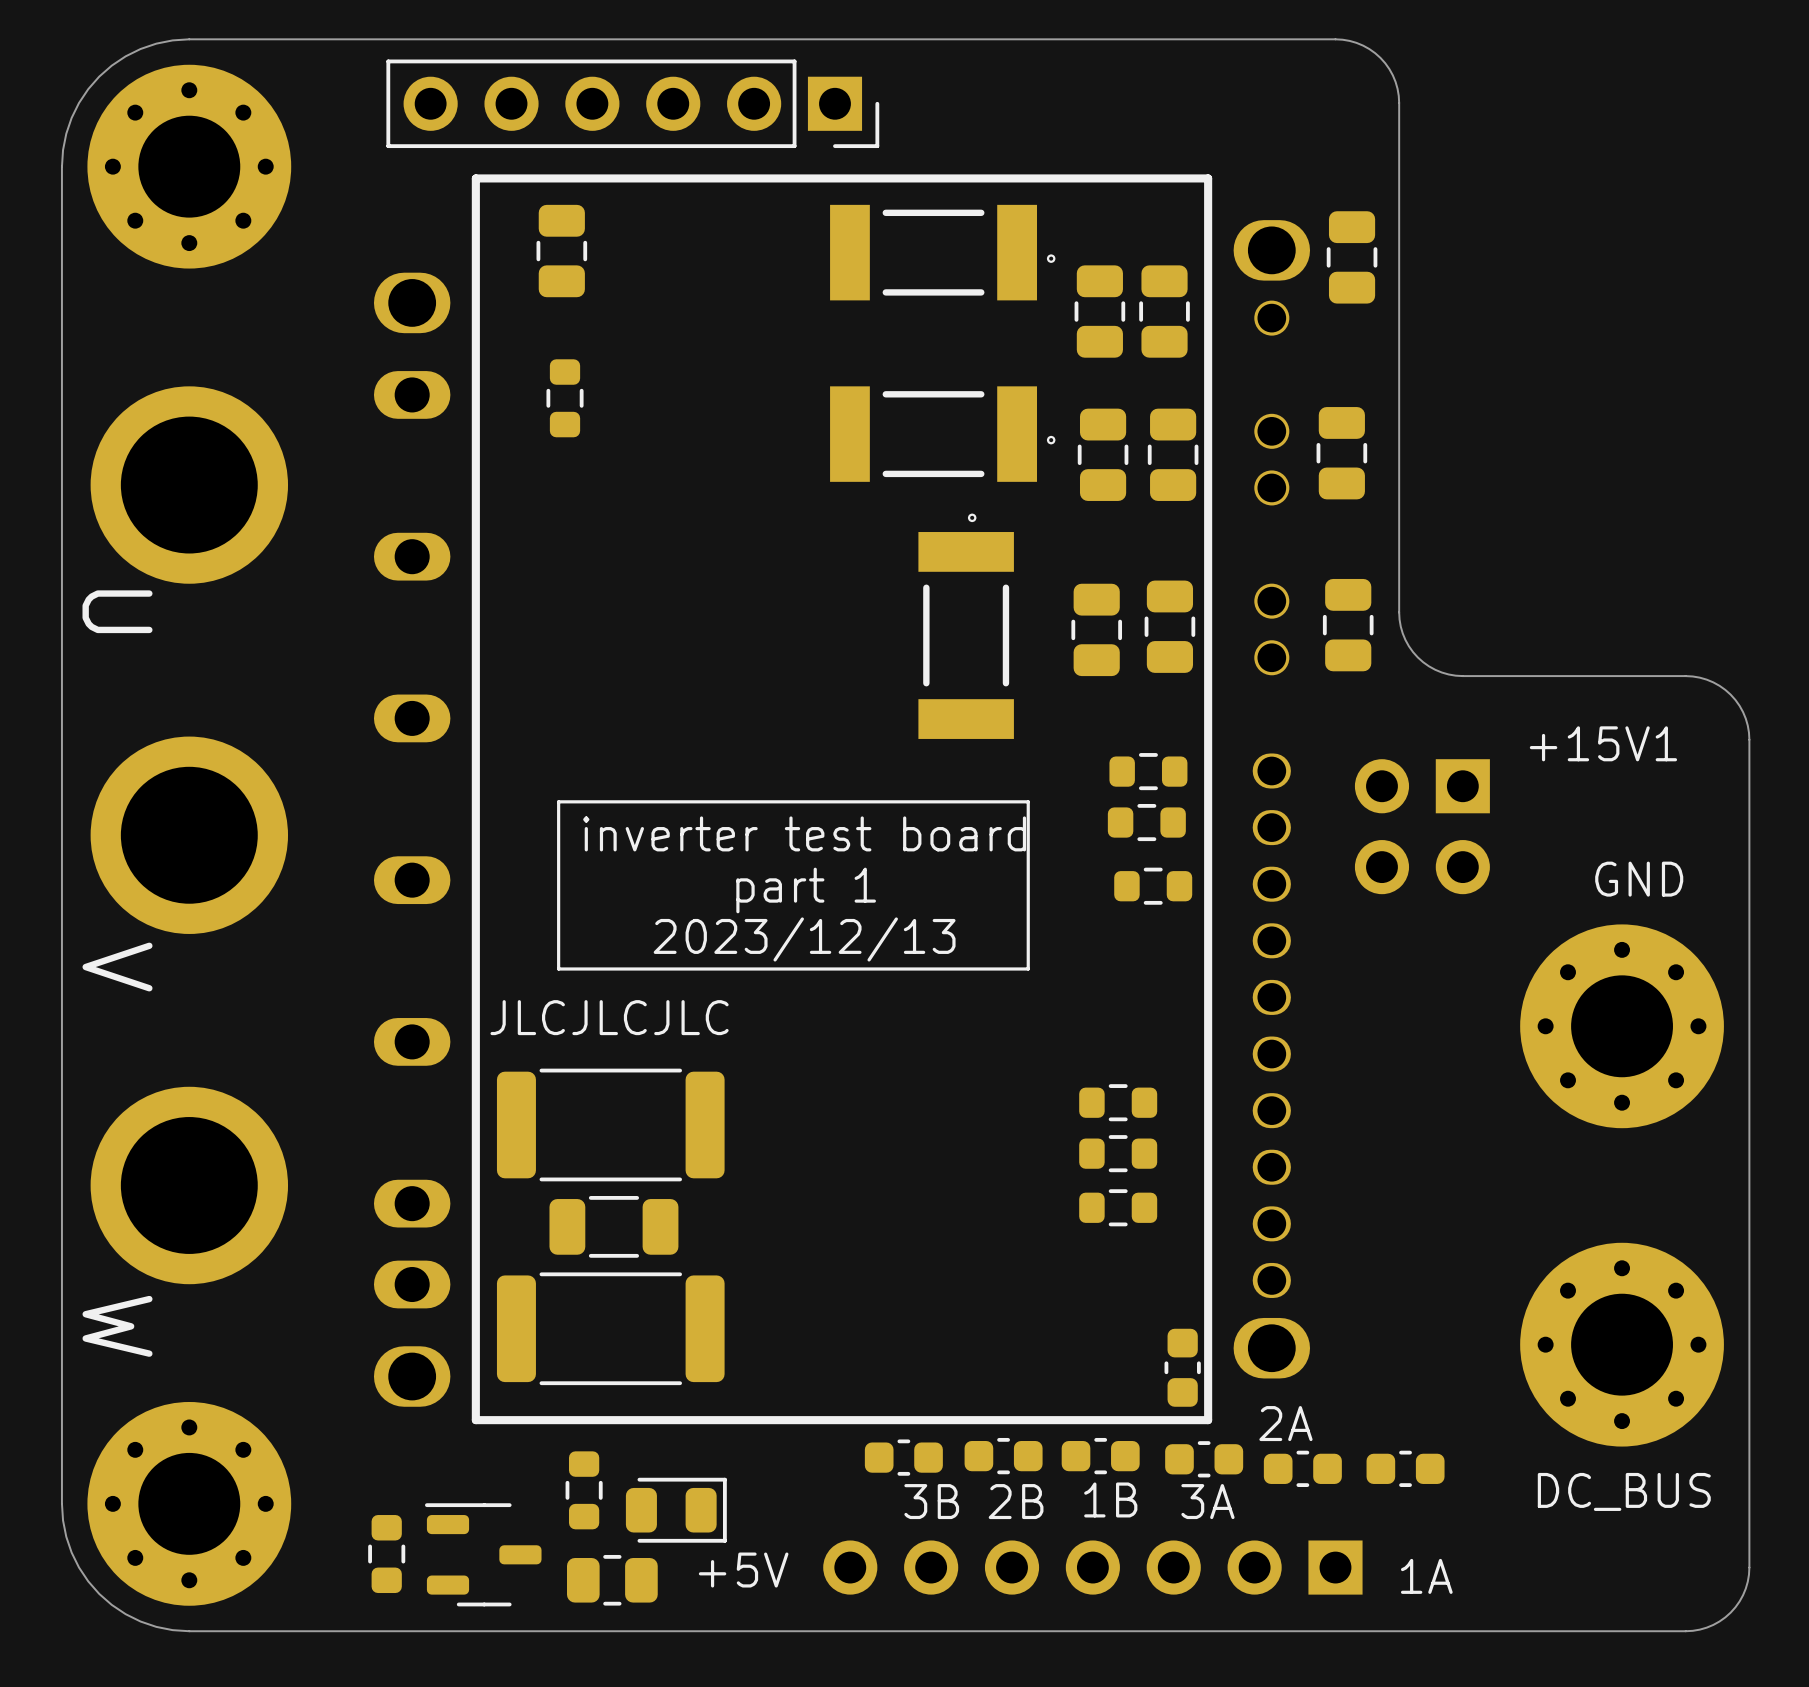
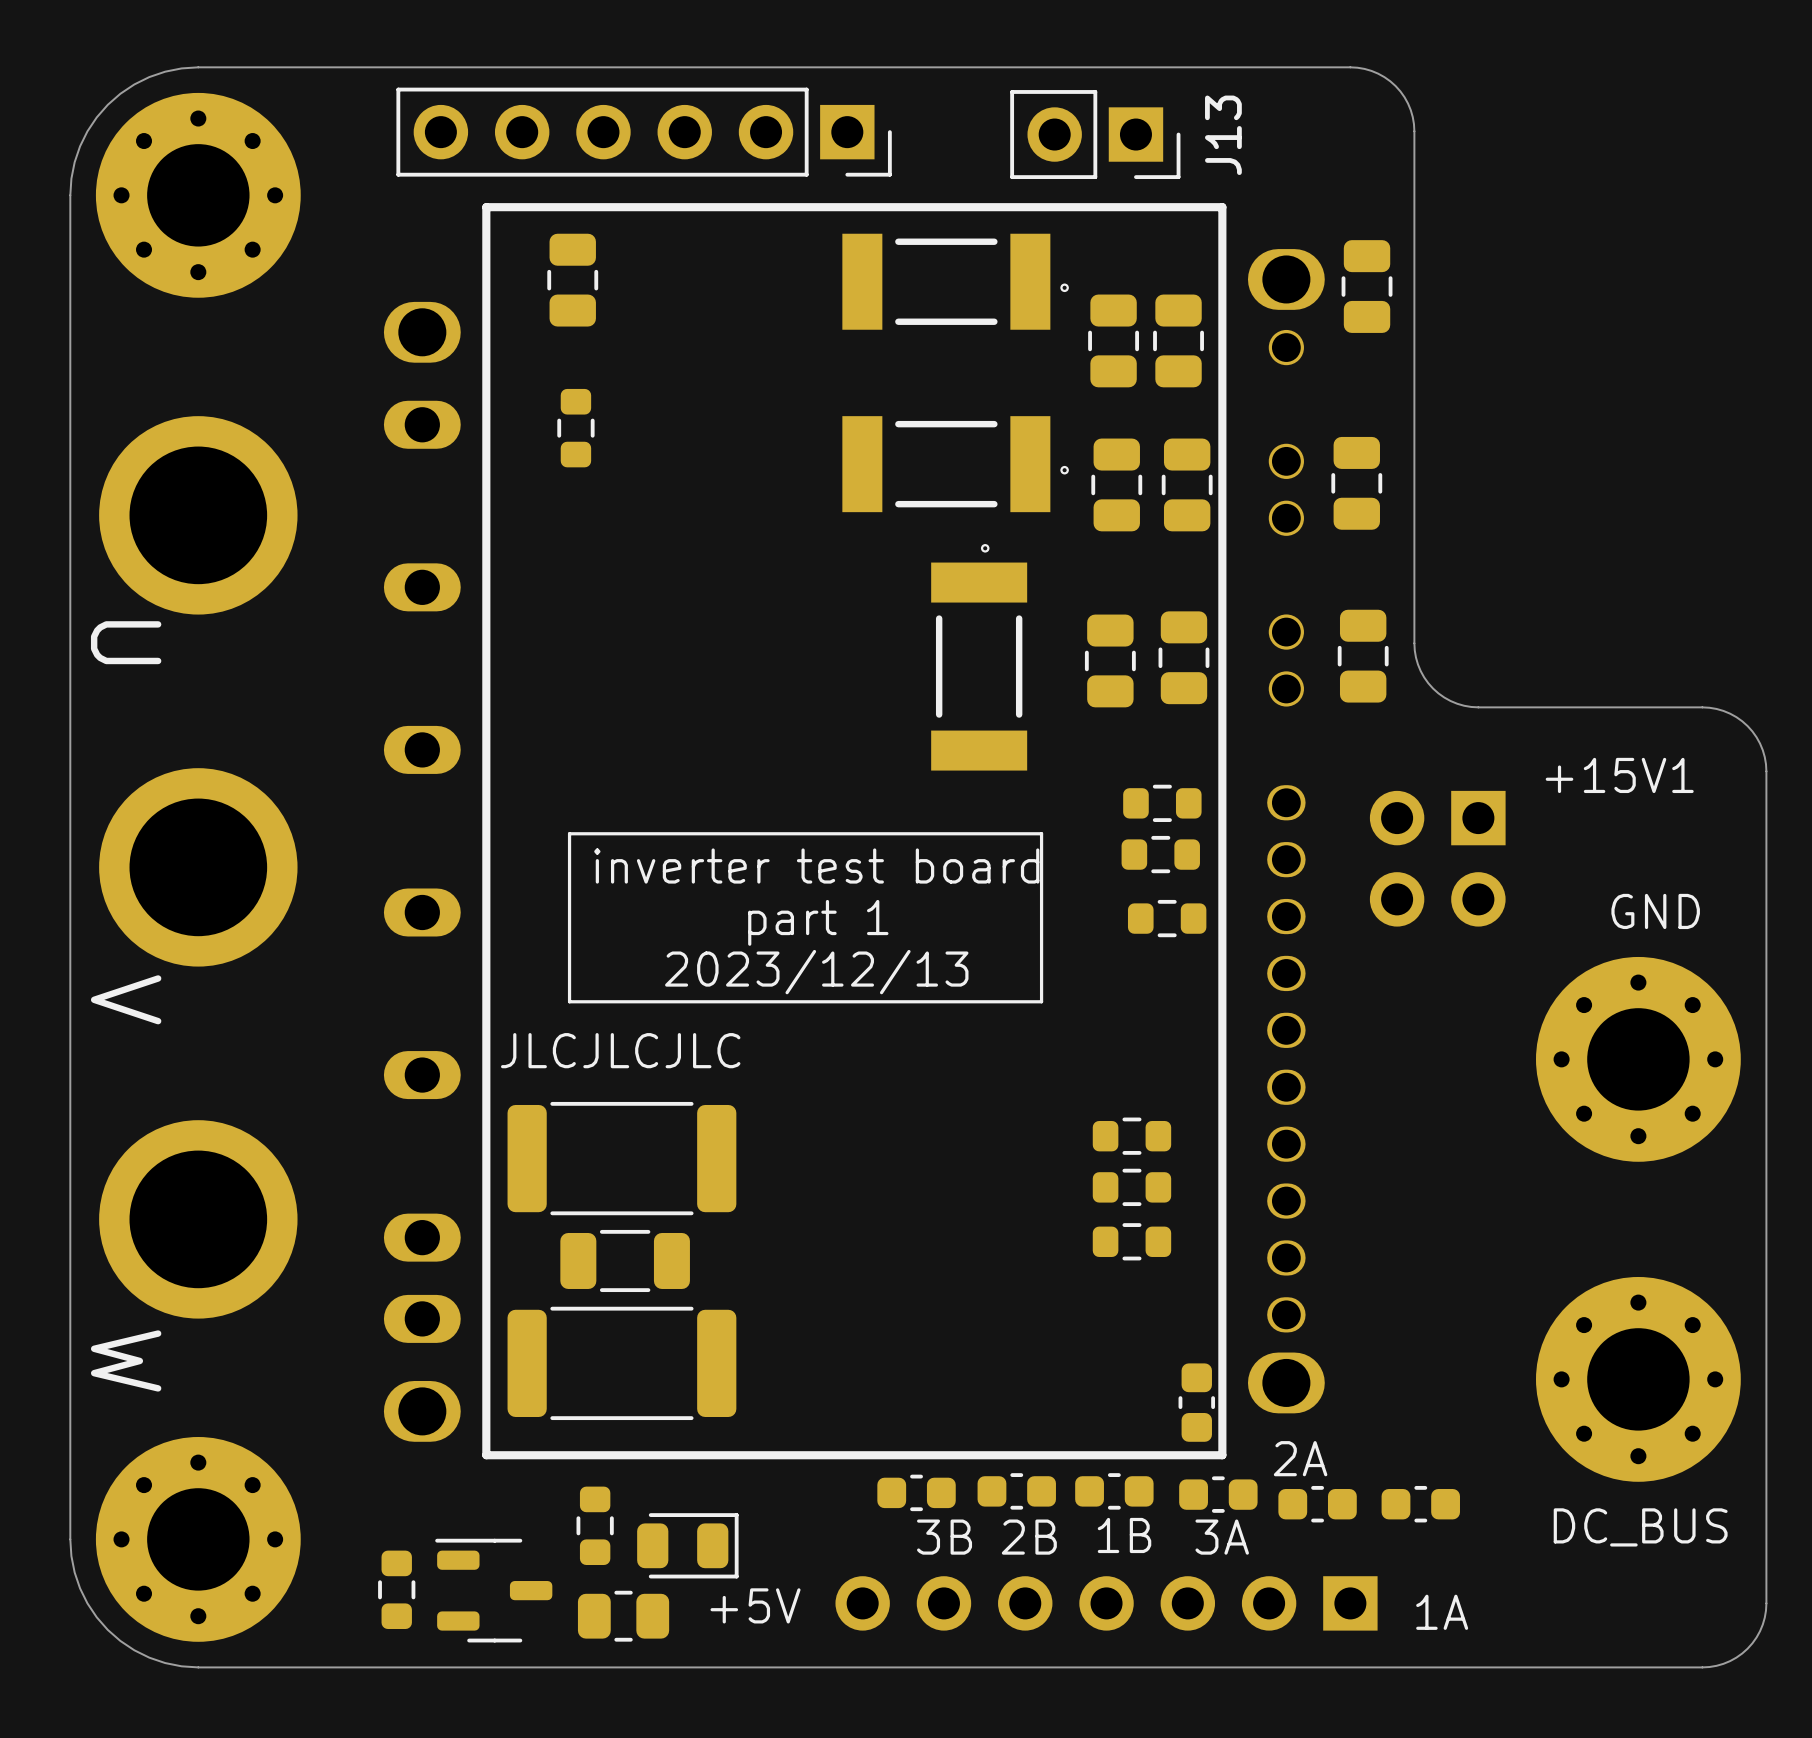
J13: none -> (1095, 134)

